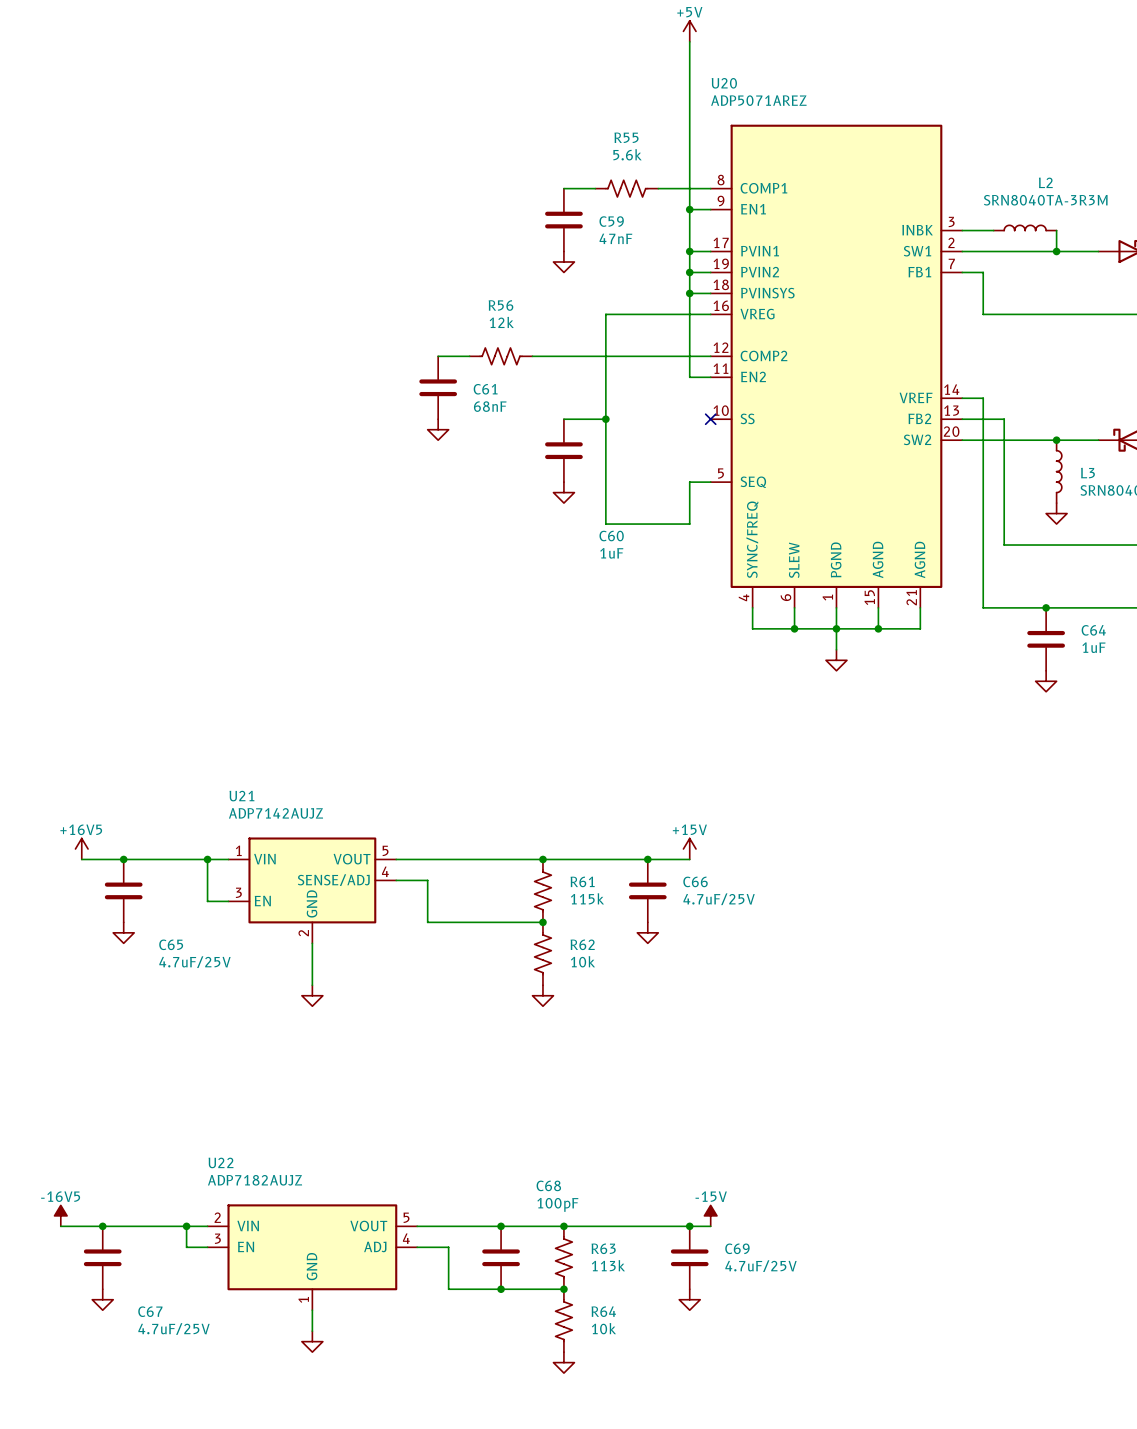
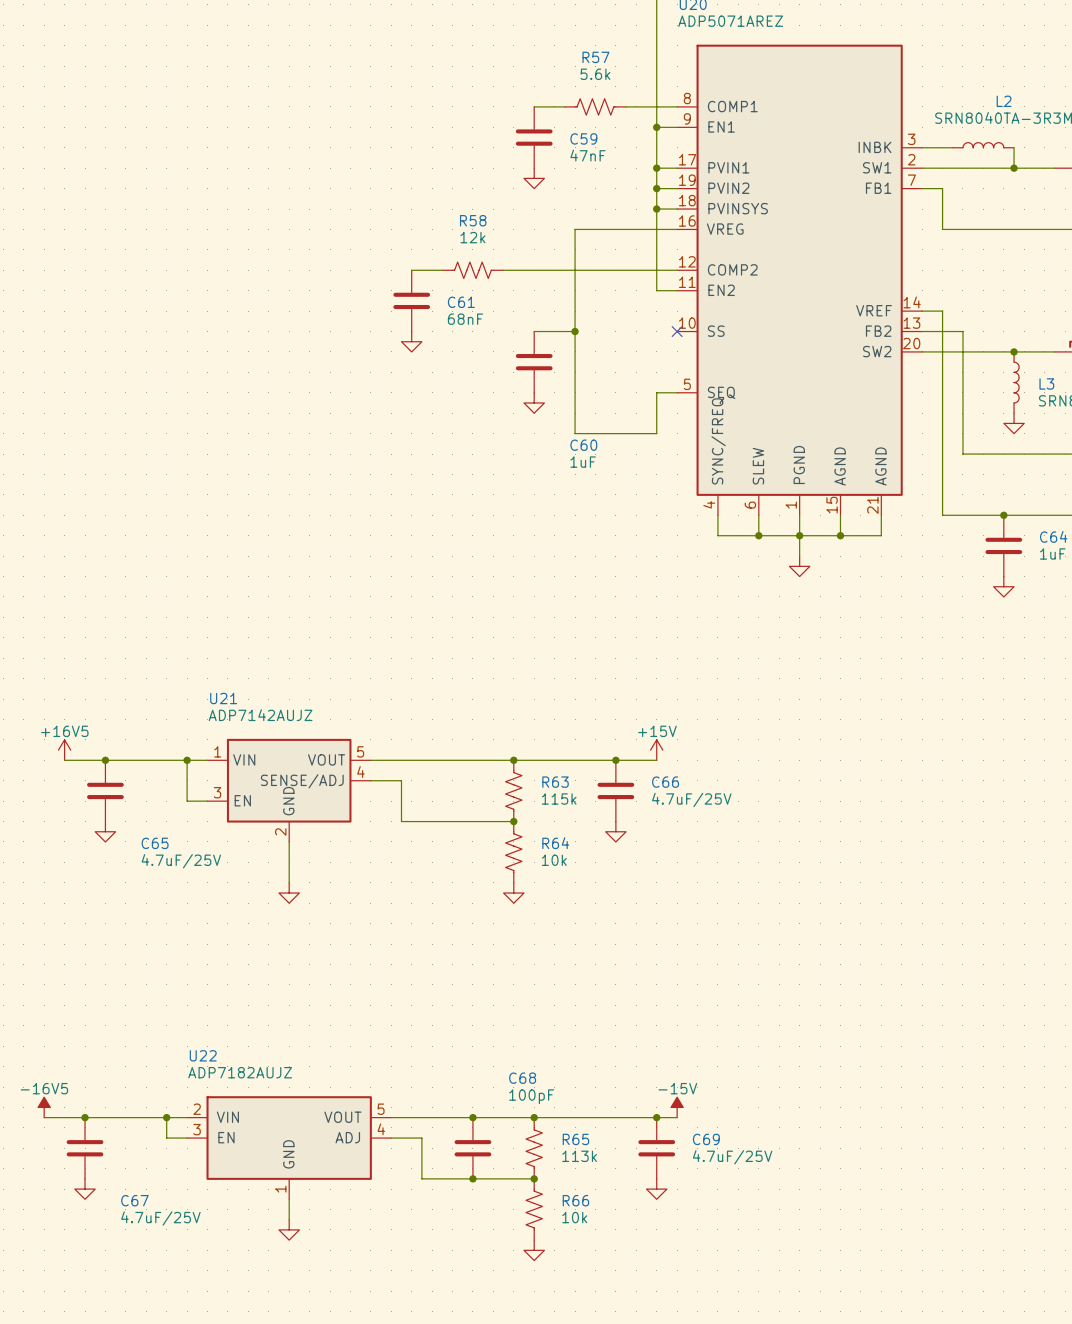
R55 name: R55 (626, 137) -> R57 (595, 57)
R56 name: R56 (500, 305) -> R58 (473, 220)
R61 name: R61 (582, 881) -> R63 (555, 782)
R62 name: R62 (582, 944) -> R64 (555, 843)
R63 name: R63 (603, 1248) -> R65 (575, 1139)
R64 name: R64 (603, 1311) -> R66 (575, 1200)

